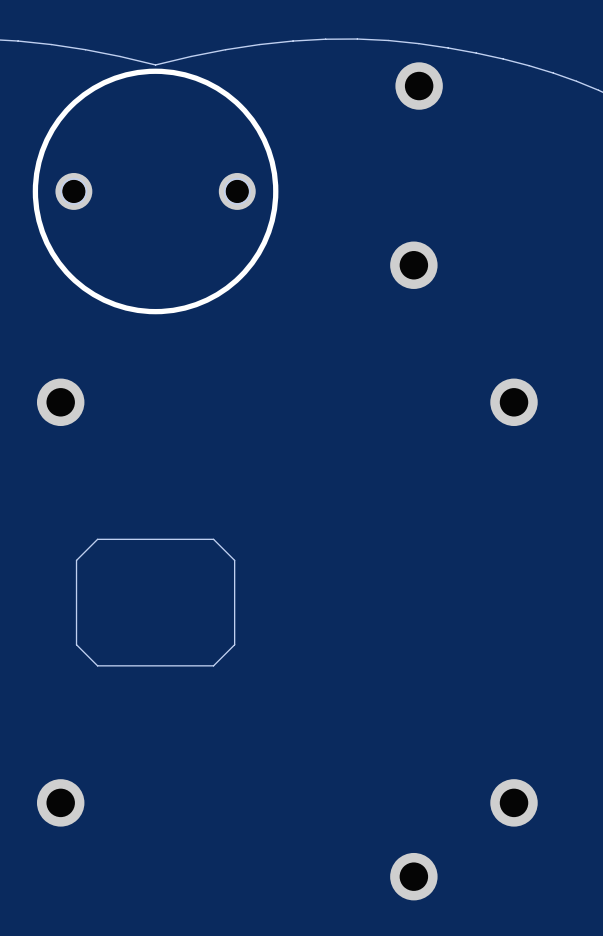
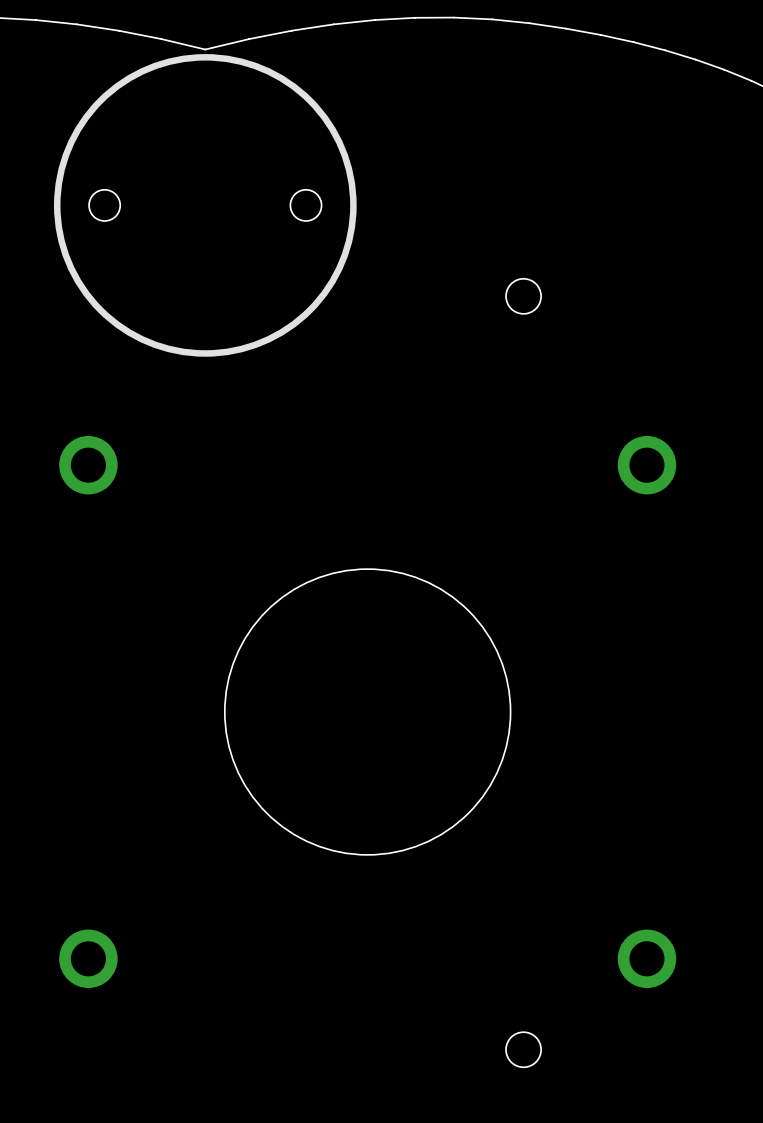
part: (419, 86) -> none
part: (73, 191) -> none
part: (237, 191) -> none
round board edge: none -> [505, 277, 542, 315]
part: (413, 265) -> none
round board edge: none -> [224, 568, 511, 856]
board edge: (213, 539) (97, 539) (76, 560) (76, 644) (97, 665) (213, 665) (234, 644) (234, 560) (213, 539) -> none
round board edge: none -> [505, 1031, 542, 1069]
part: (413, 876) -> none

